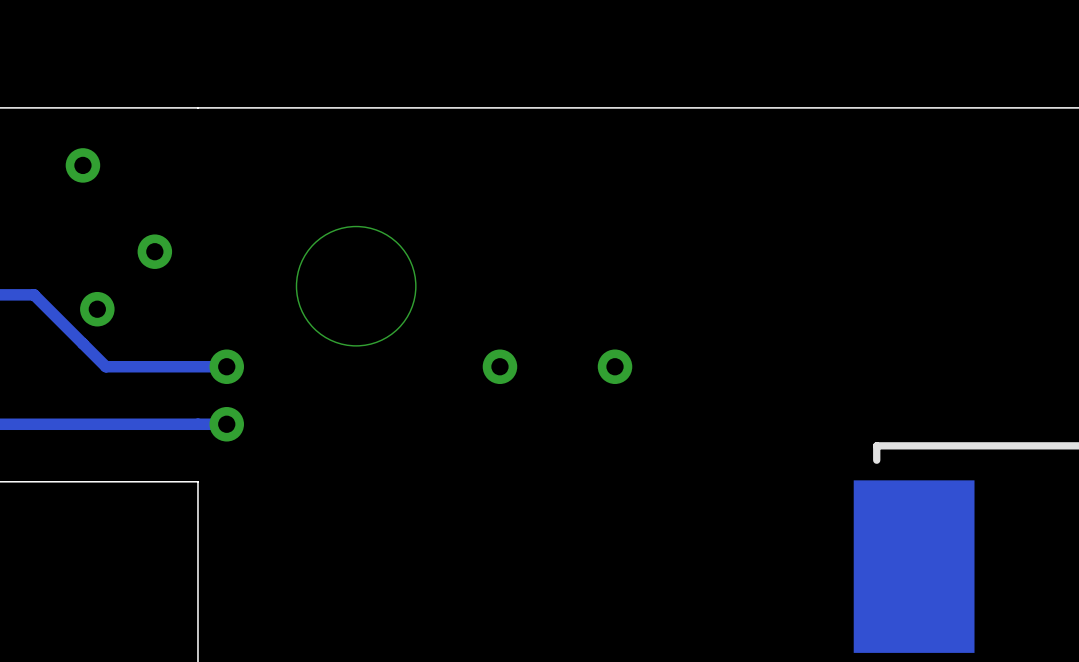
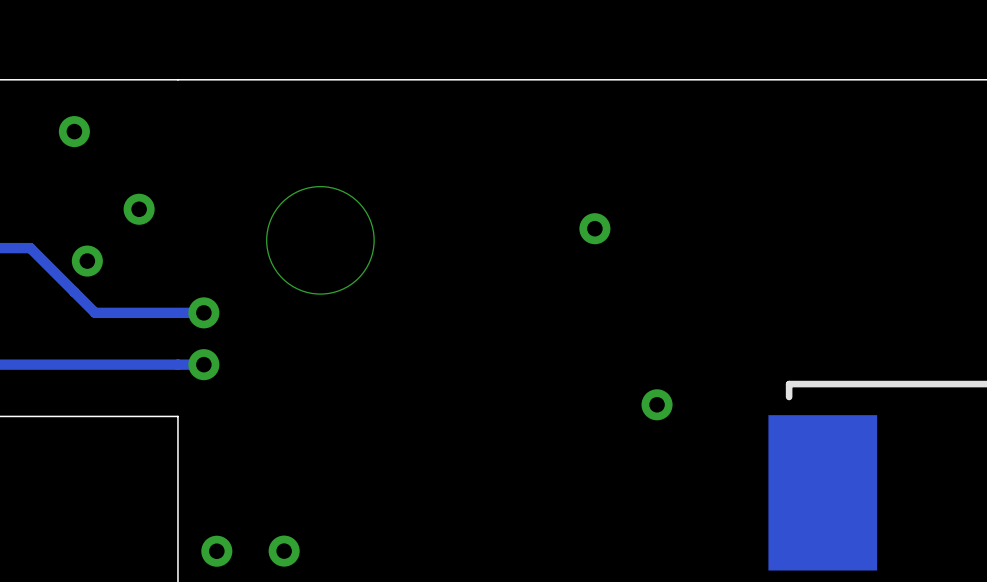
via: none -> (594, 228)
via: (499, 366) -> none
via: (615, 366) -> none
via: none -> (657, 404)
via: none -> (216, 551)
via: none -> (284, 551)

